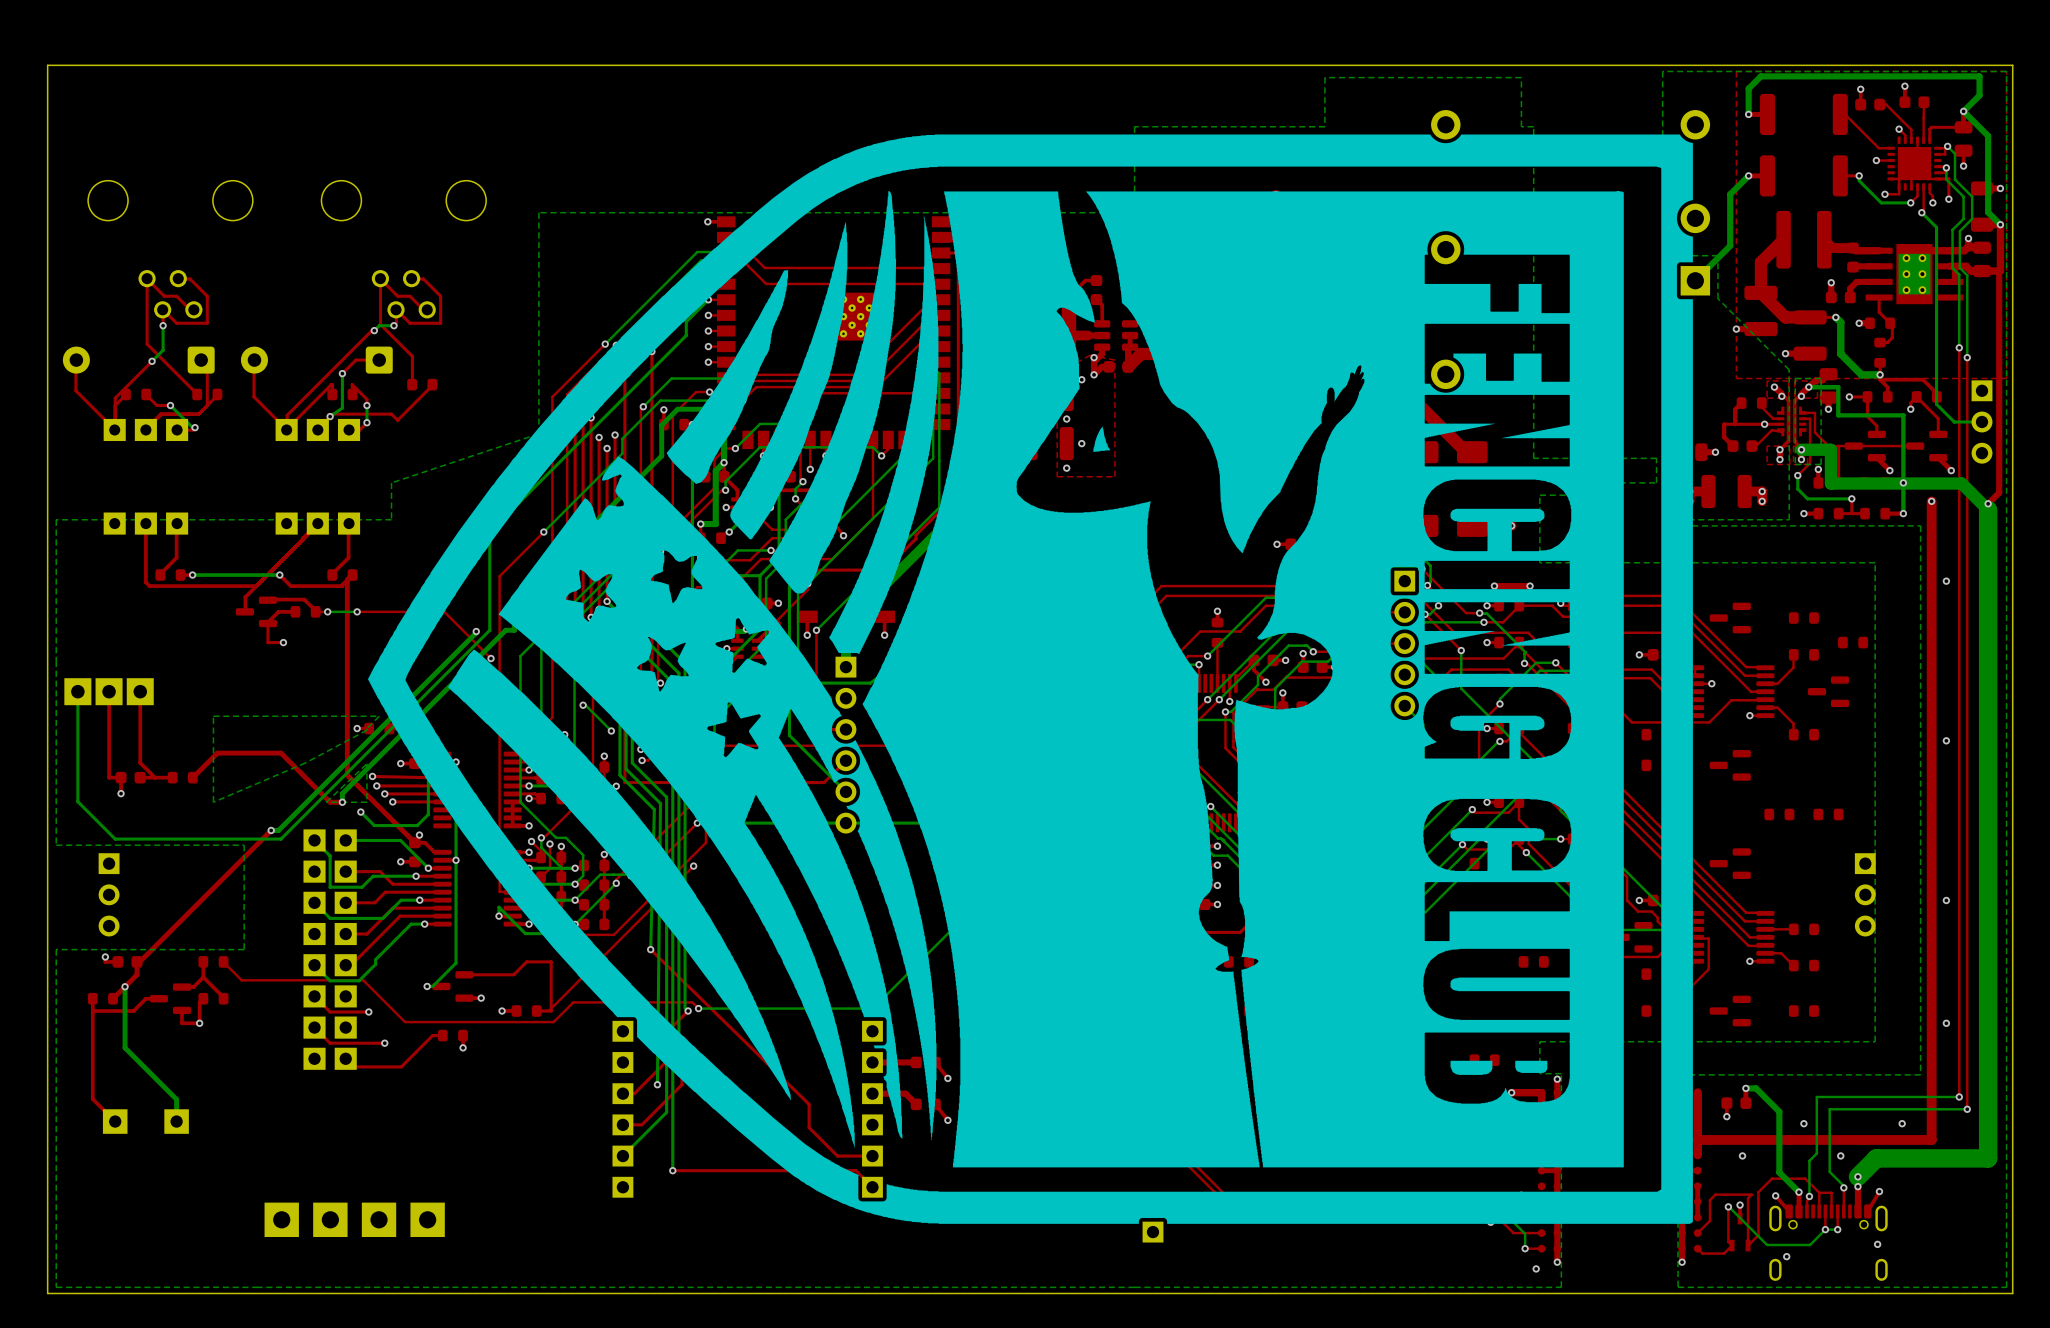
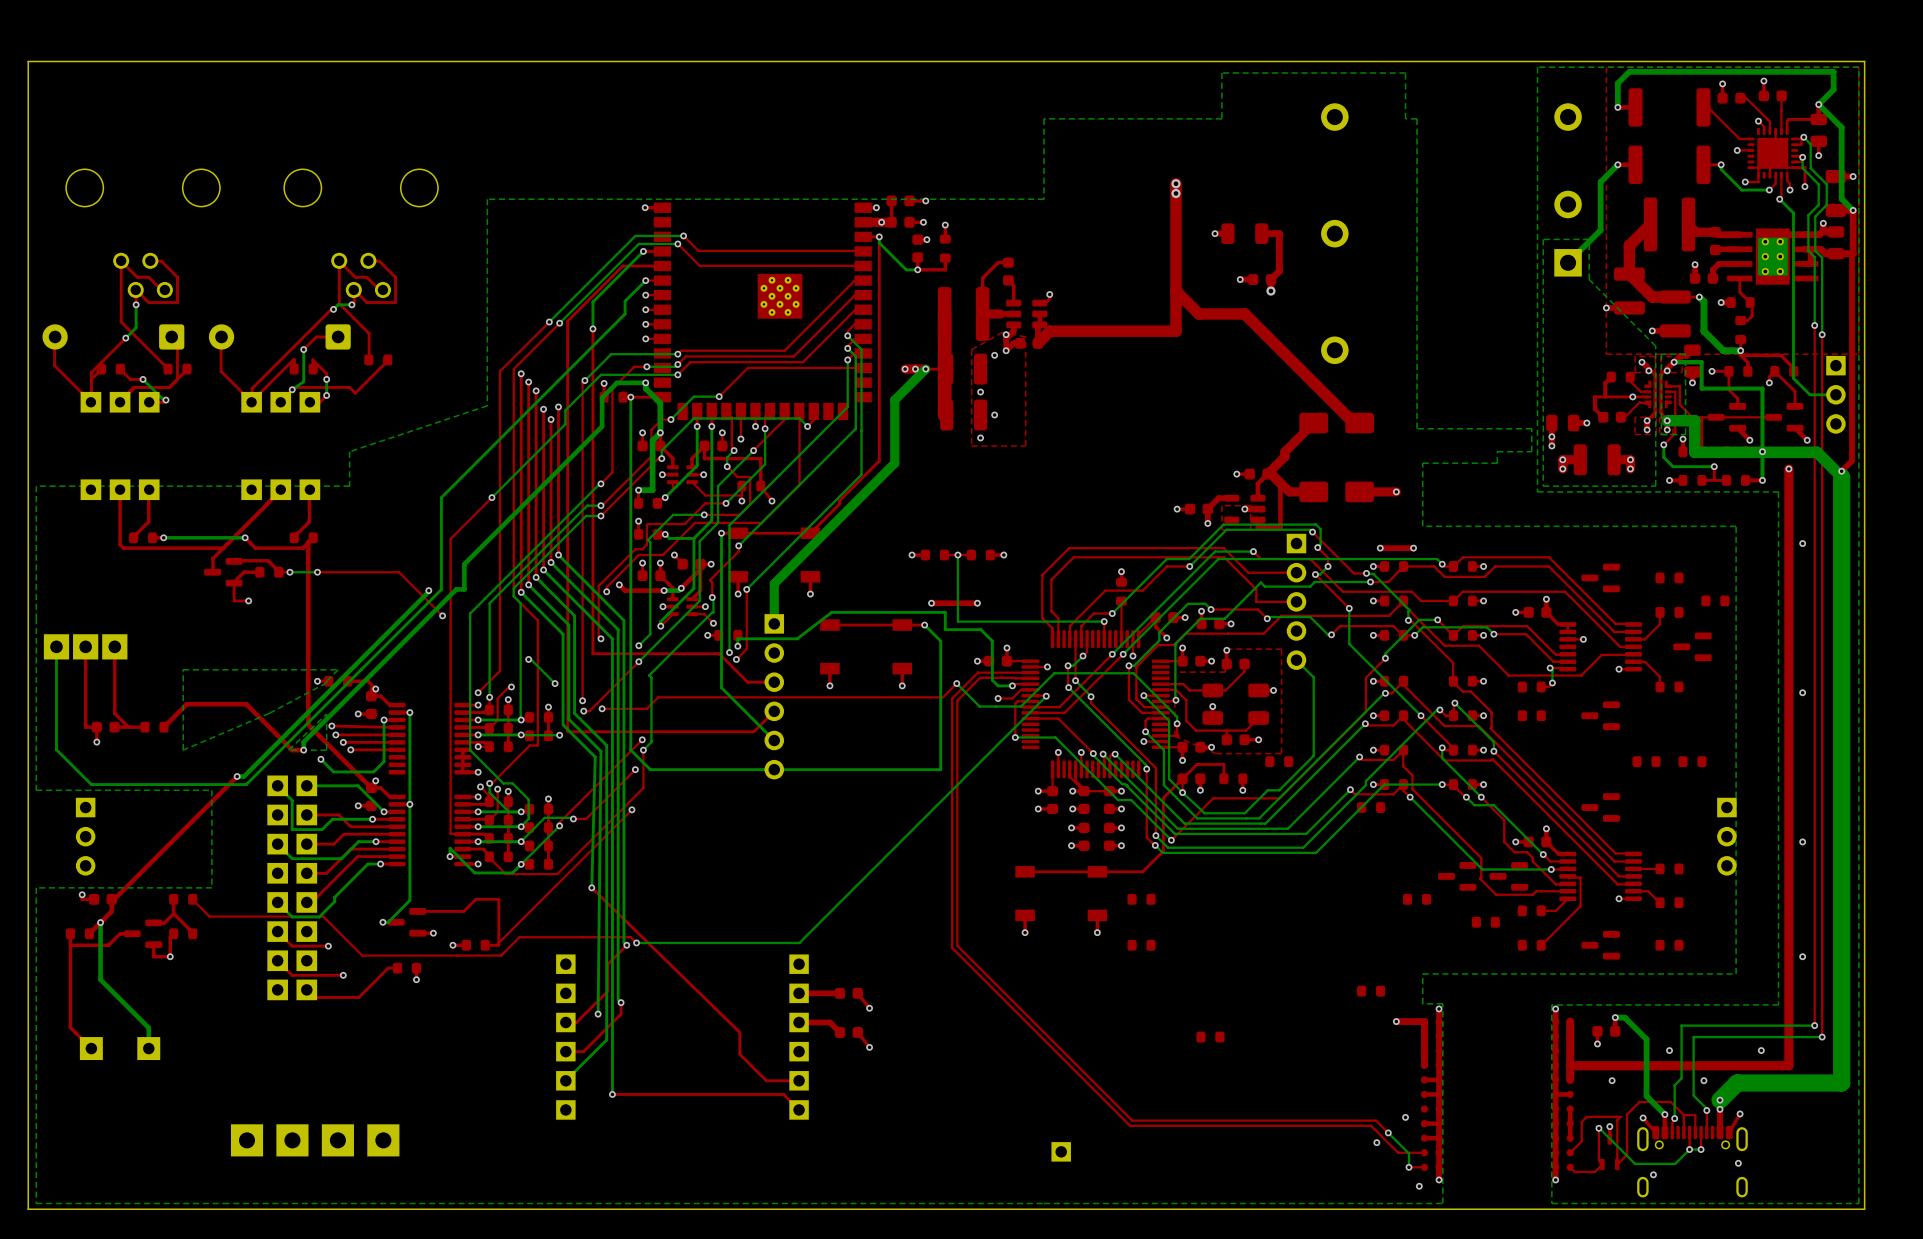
drawing: [367, 134, 1693, 1224] -> none

